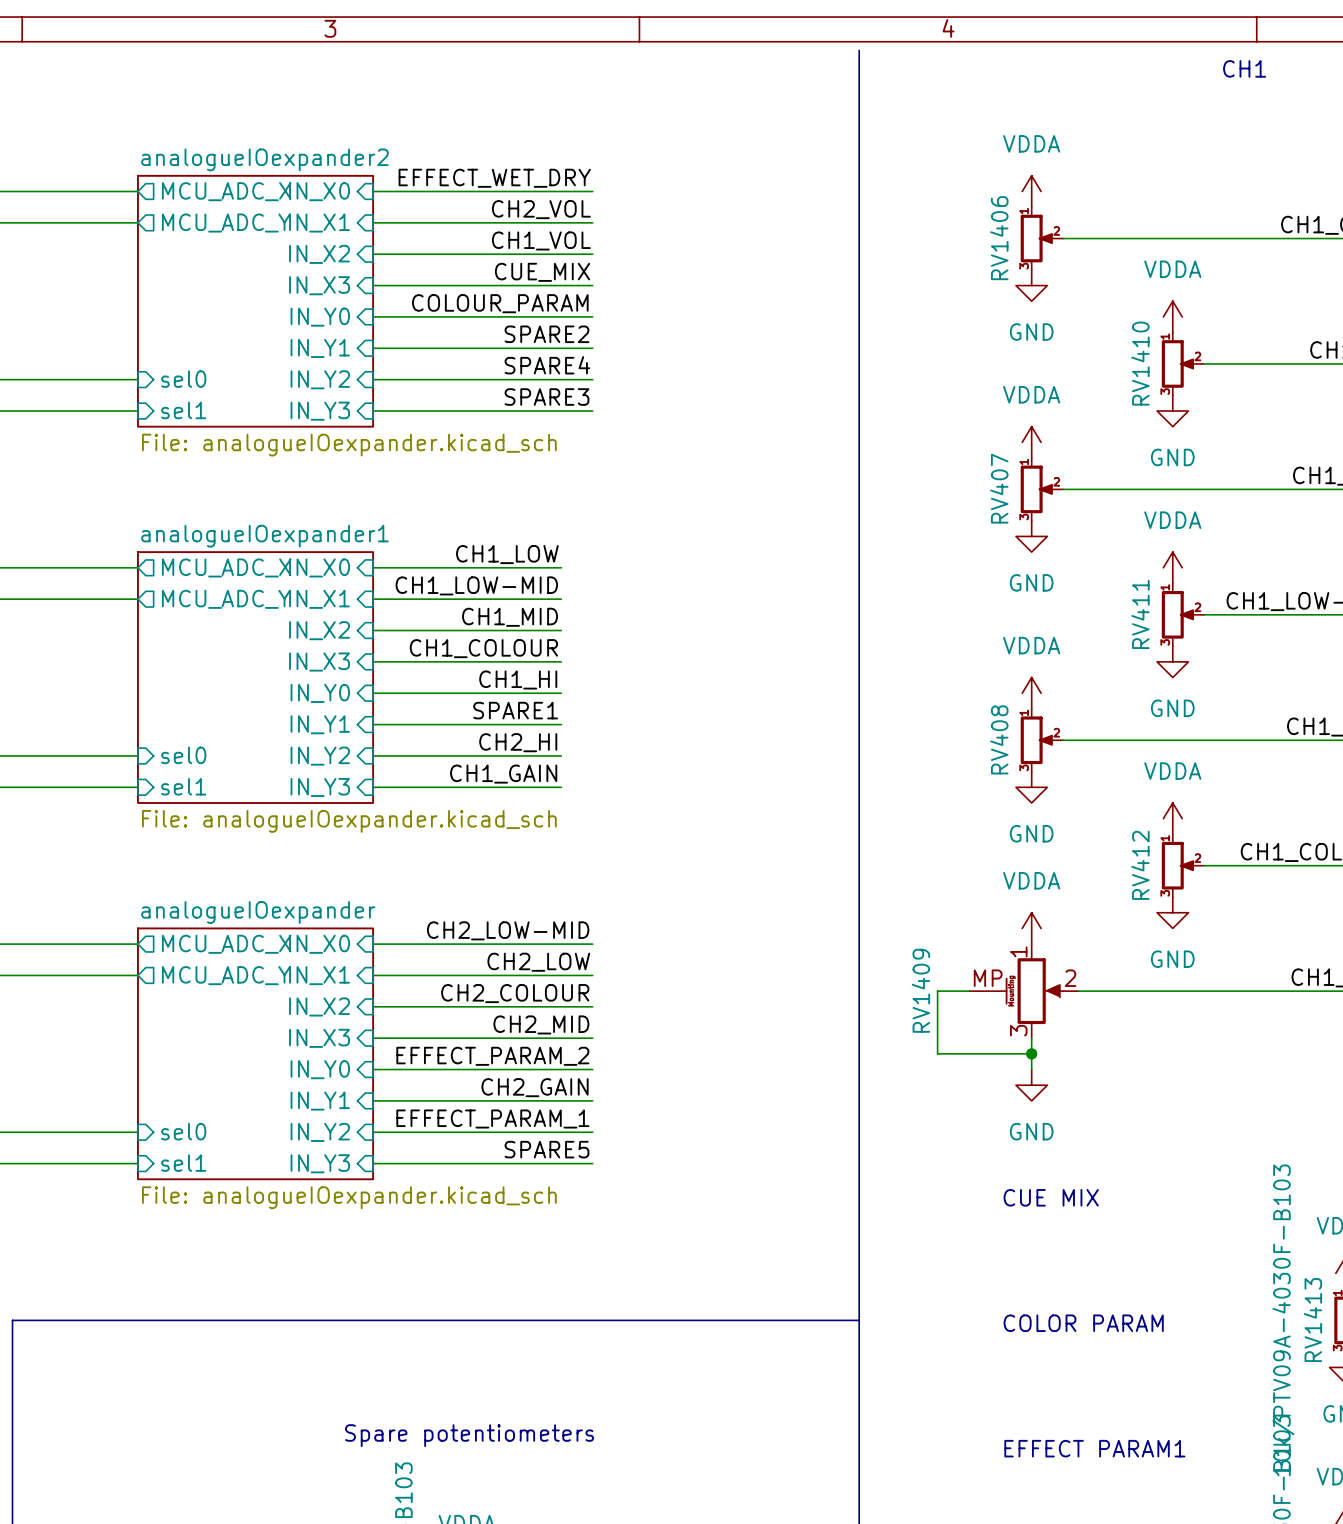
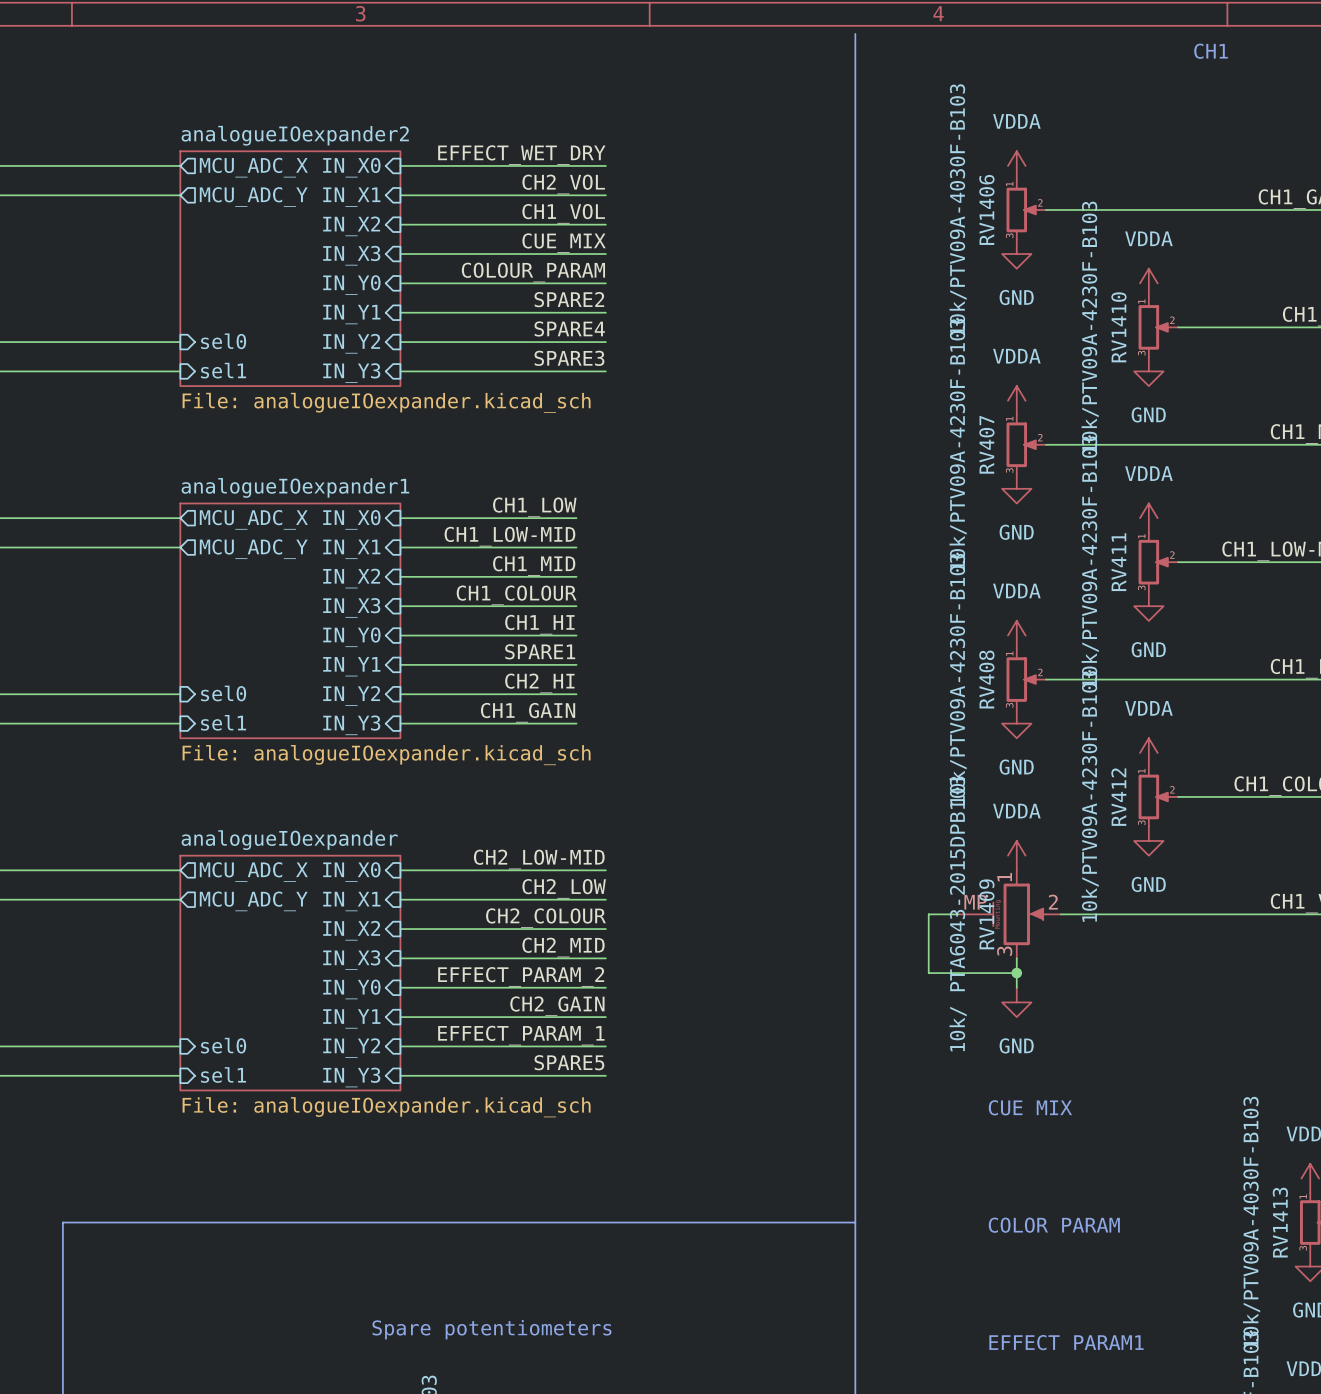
RV1406 value: none -> 10k/PTV09A-4030F-B103 (958, 209)
RV1410 value: none -> 10k/PTV09A-4230F-B103 (1090, 326)
RV407 value: none -> 10k/PTV09A-4230F-B103 (958, 444)
RV411 value: none -> 10k/PTV09A-4230F-B103 (1090, 561)
RV408 value: none -> 10k/PTV09A-4230F-B103 (958, 679)
RV412 value: none -> 10k/PTV09A-4230F-B103 (1090, 796)
RV1409 name position: RV1409 (920, 990) -> RV1409 (986, 914)
RV1409 value: none -> 10k/ PTA6043-2015DPB103 (958, 913)

